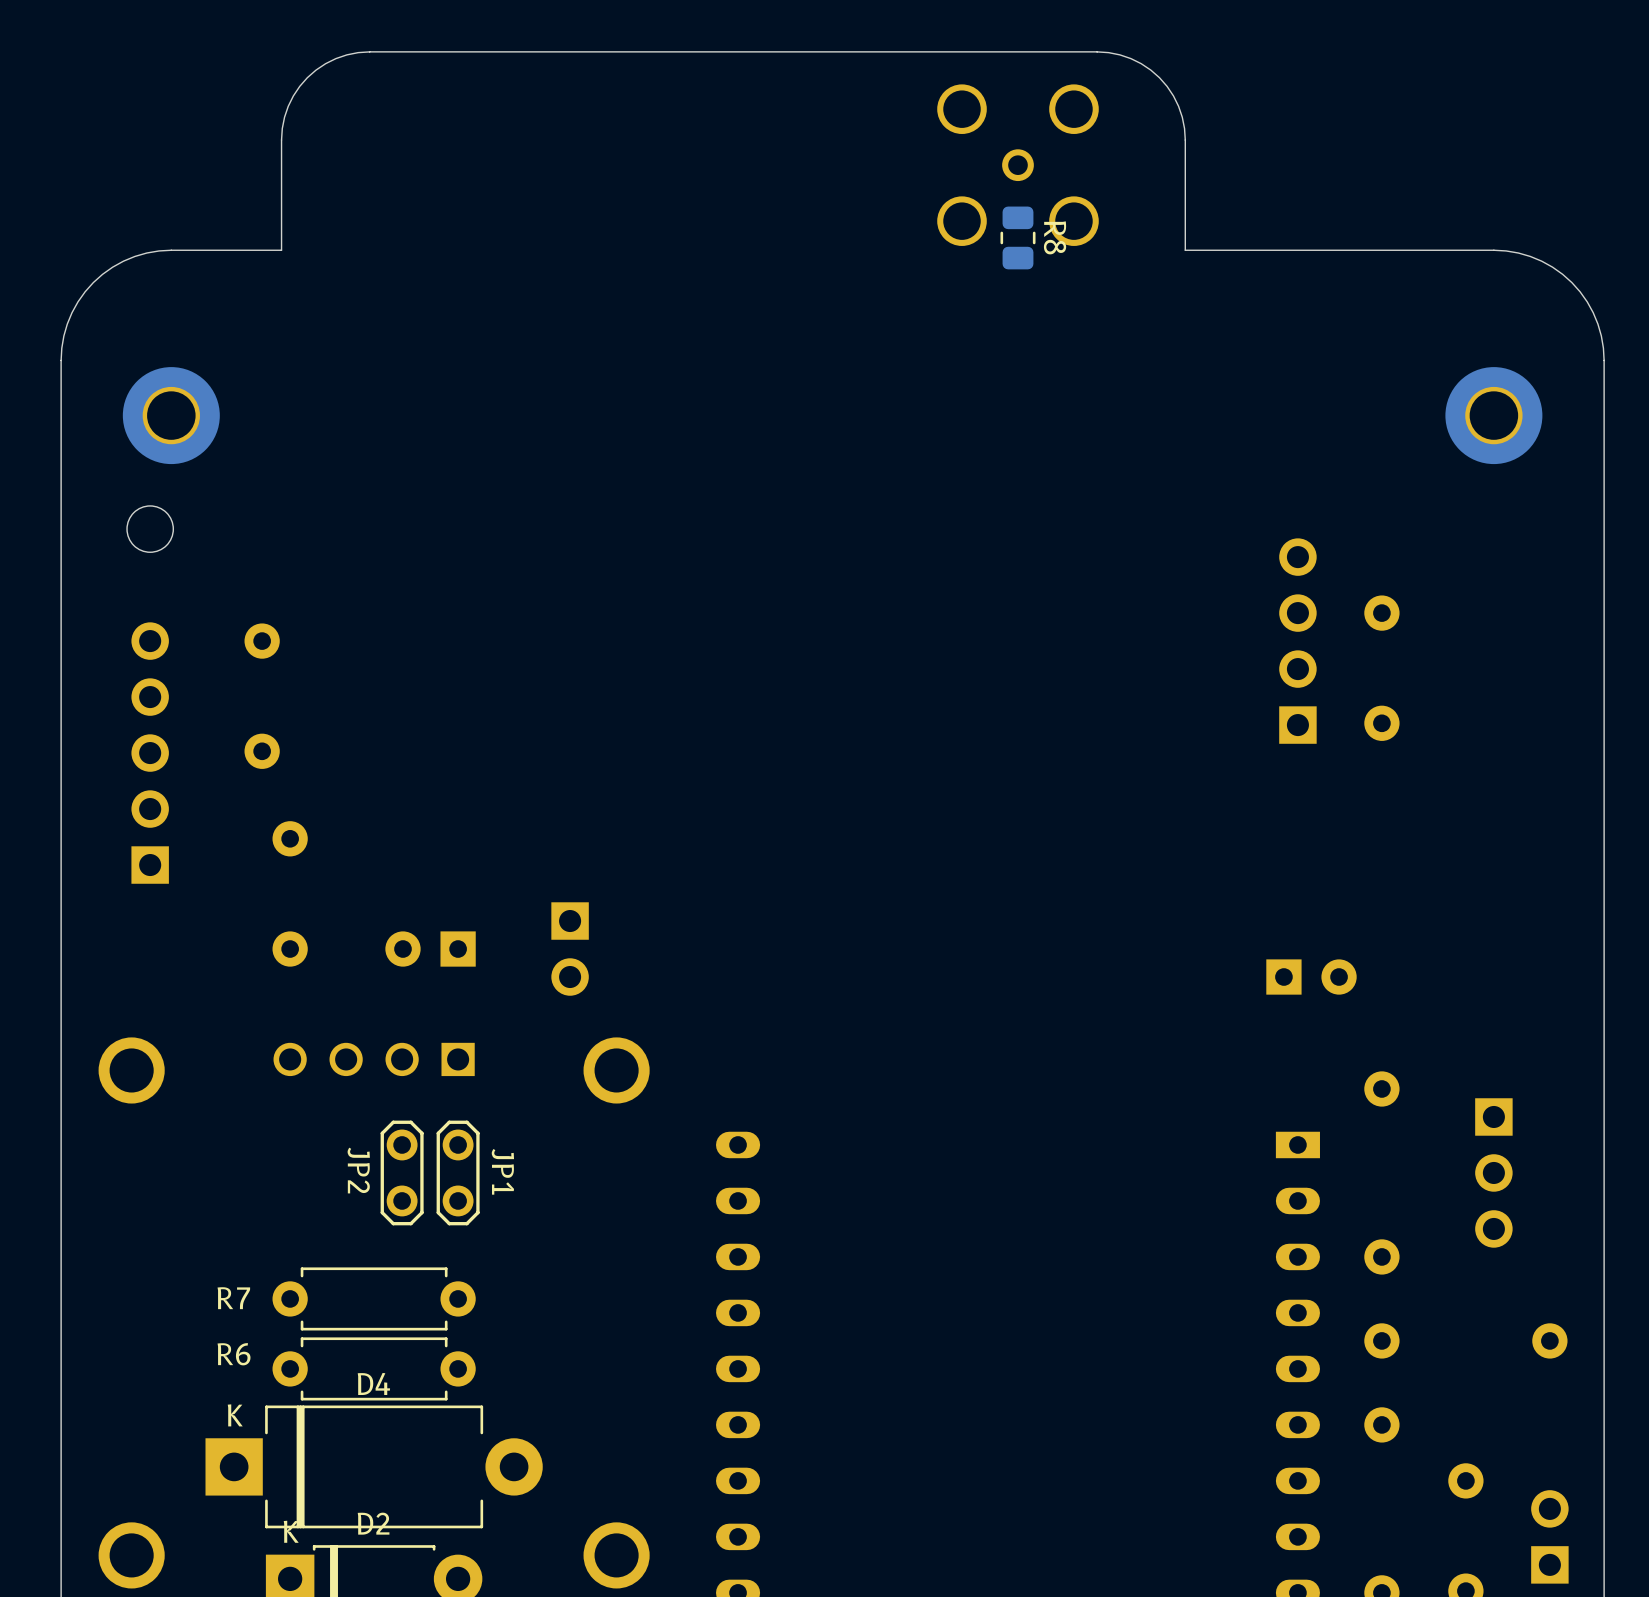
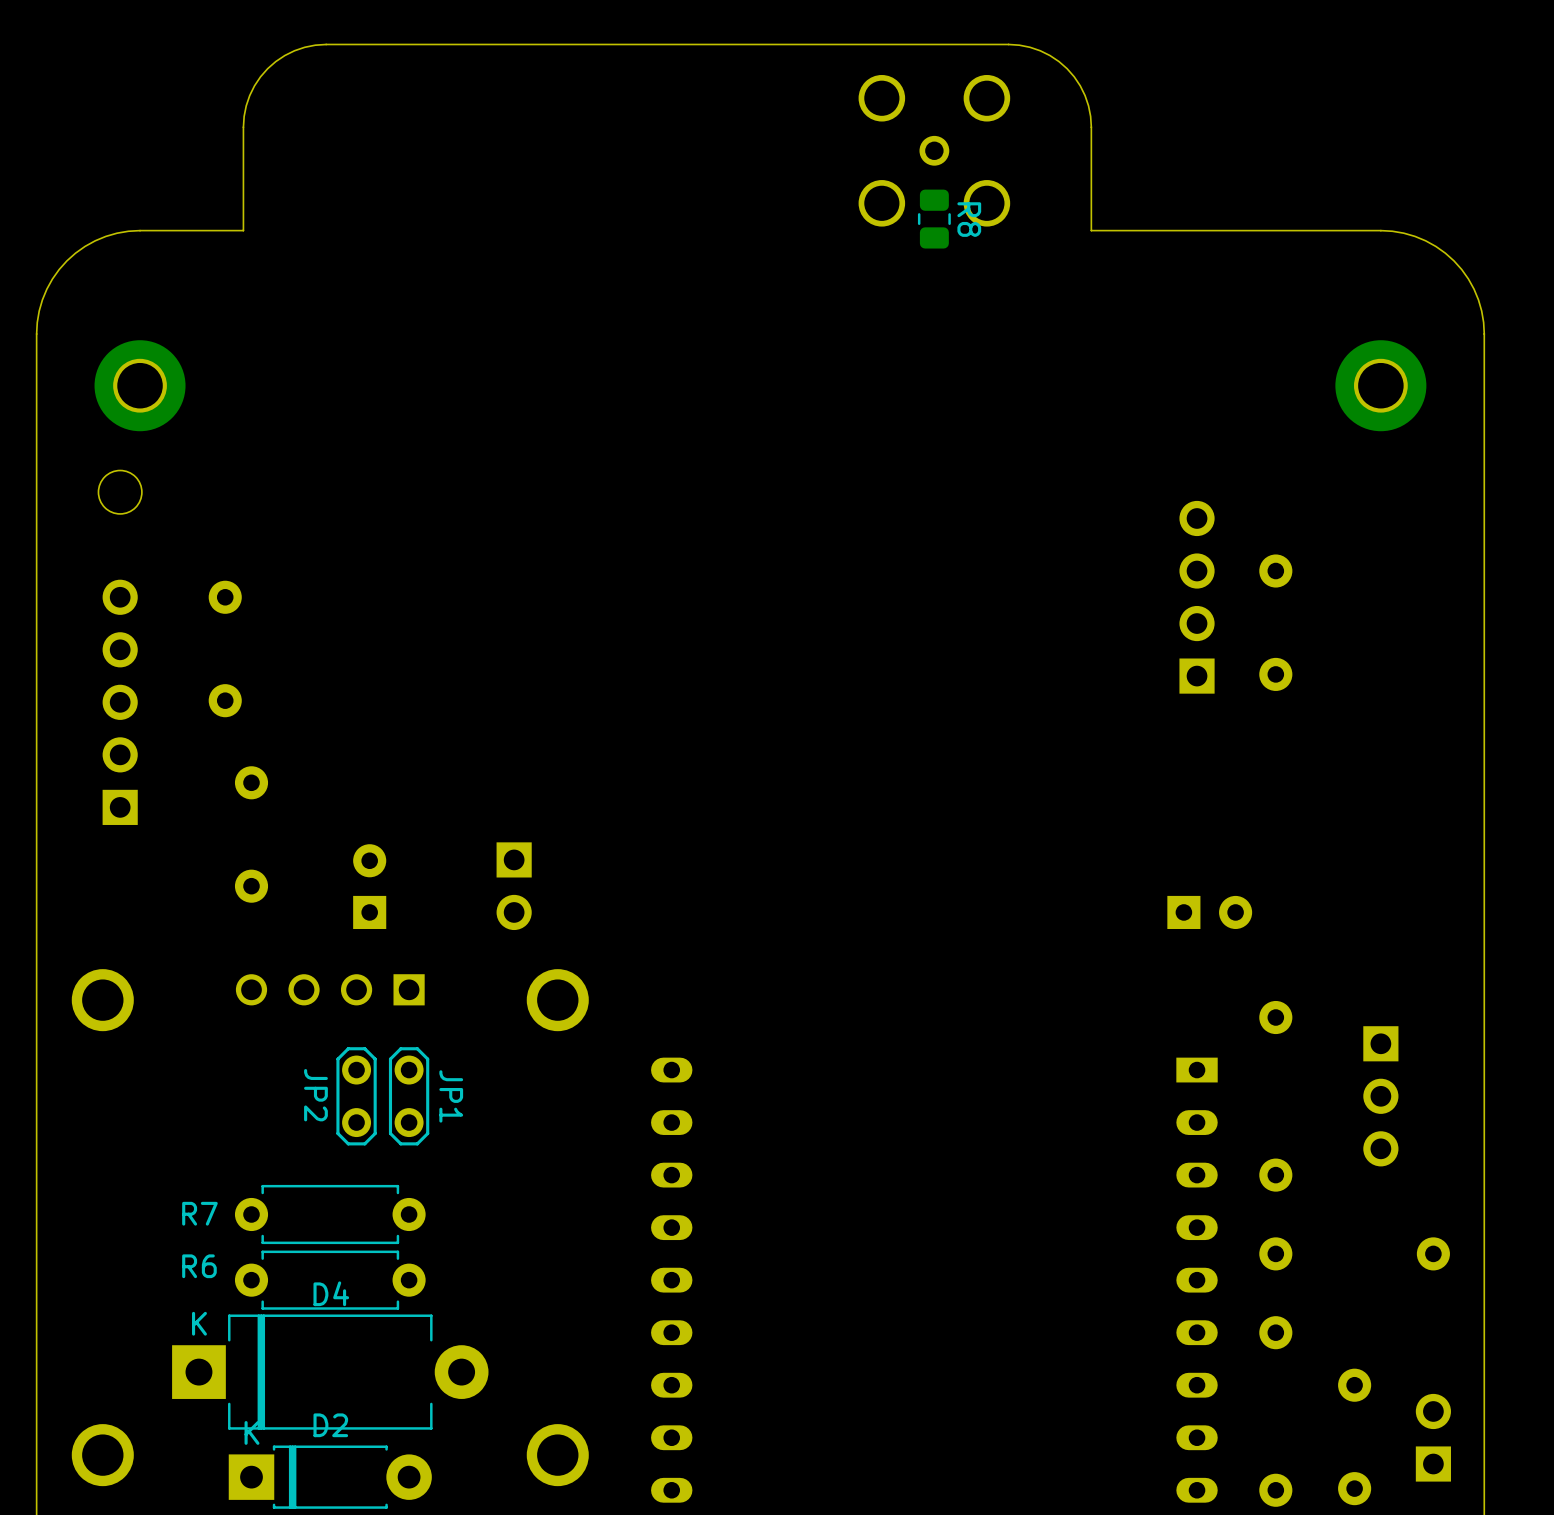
part rotation: 0° (430, 949) -> 90° clockwise (369, 886)

